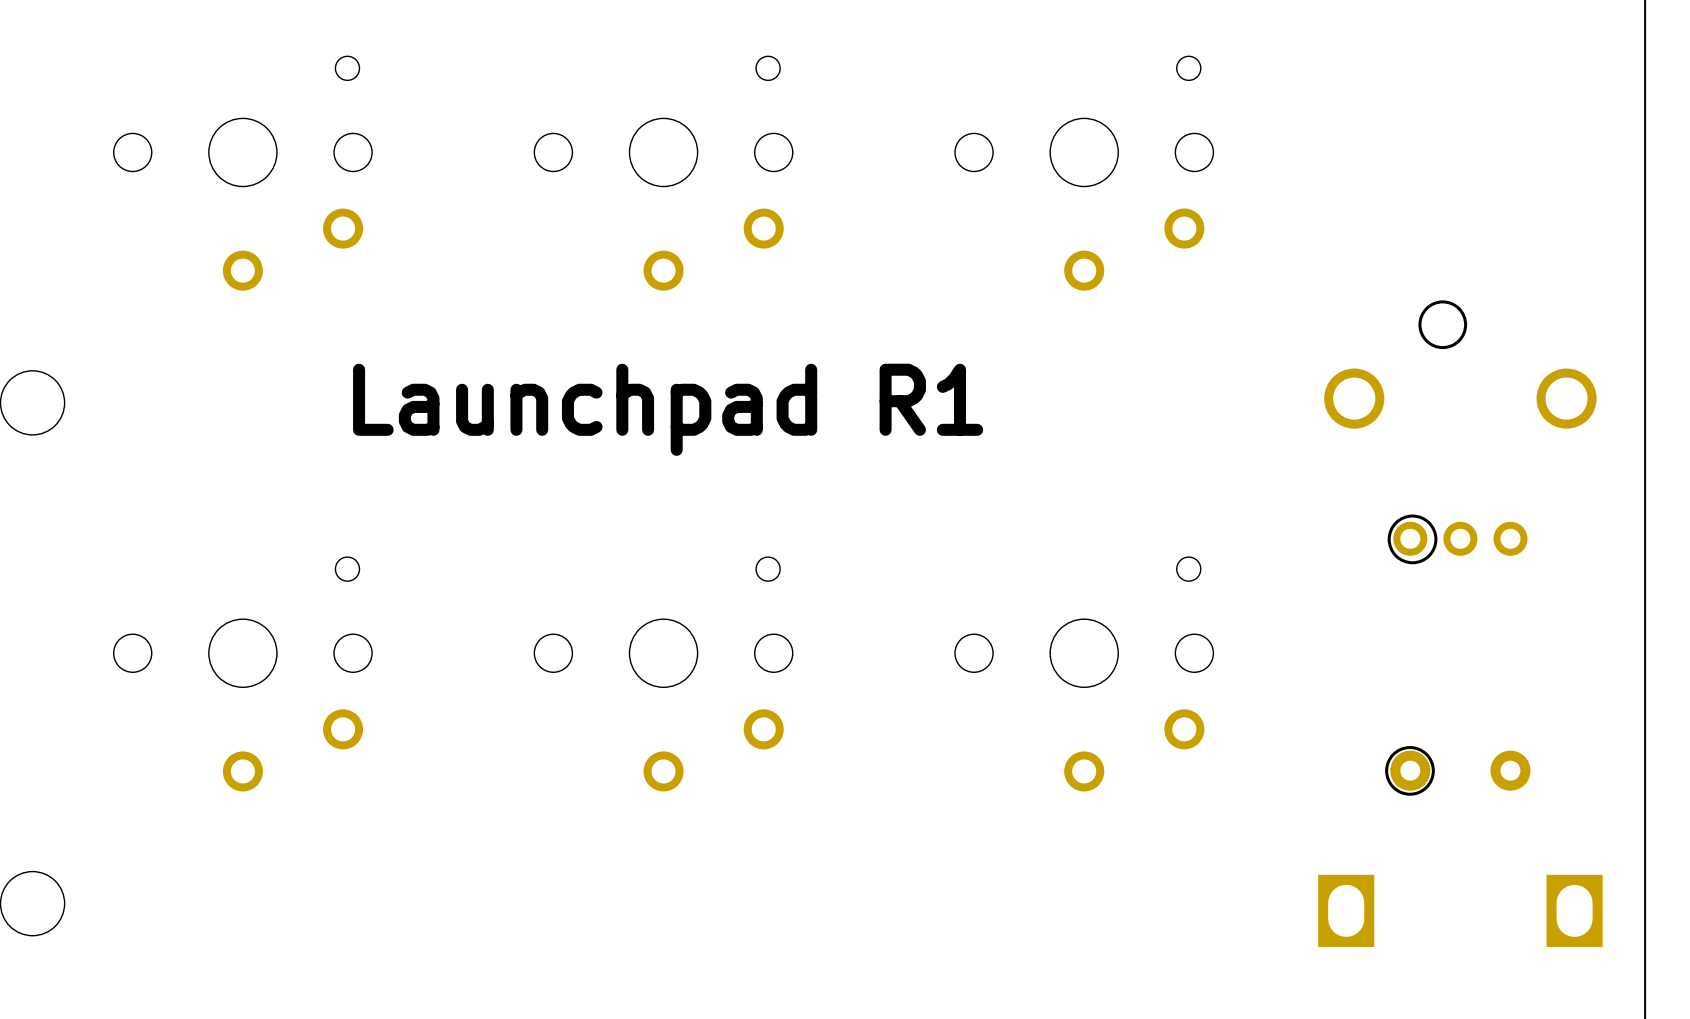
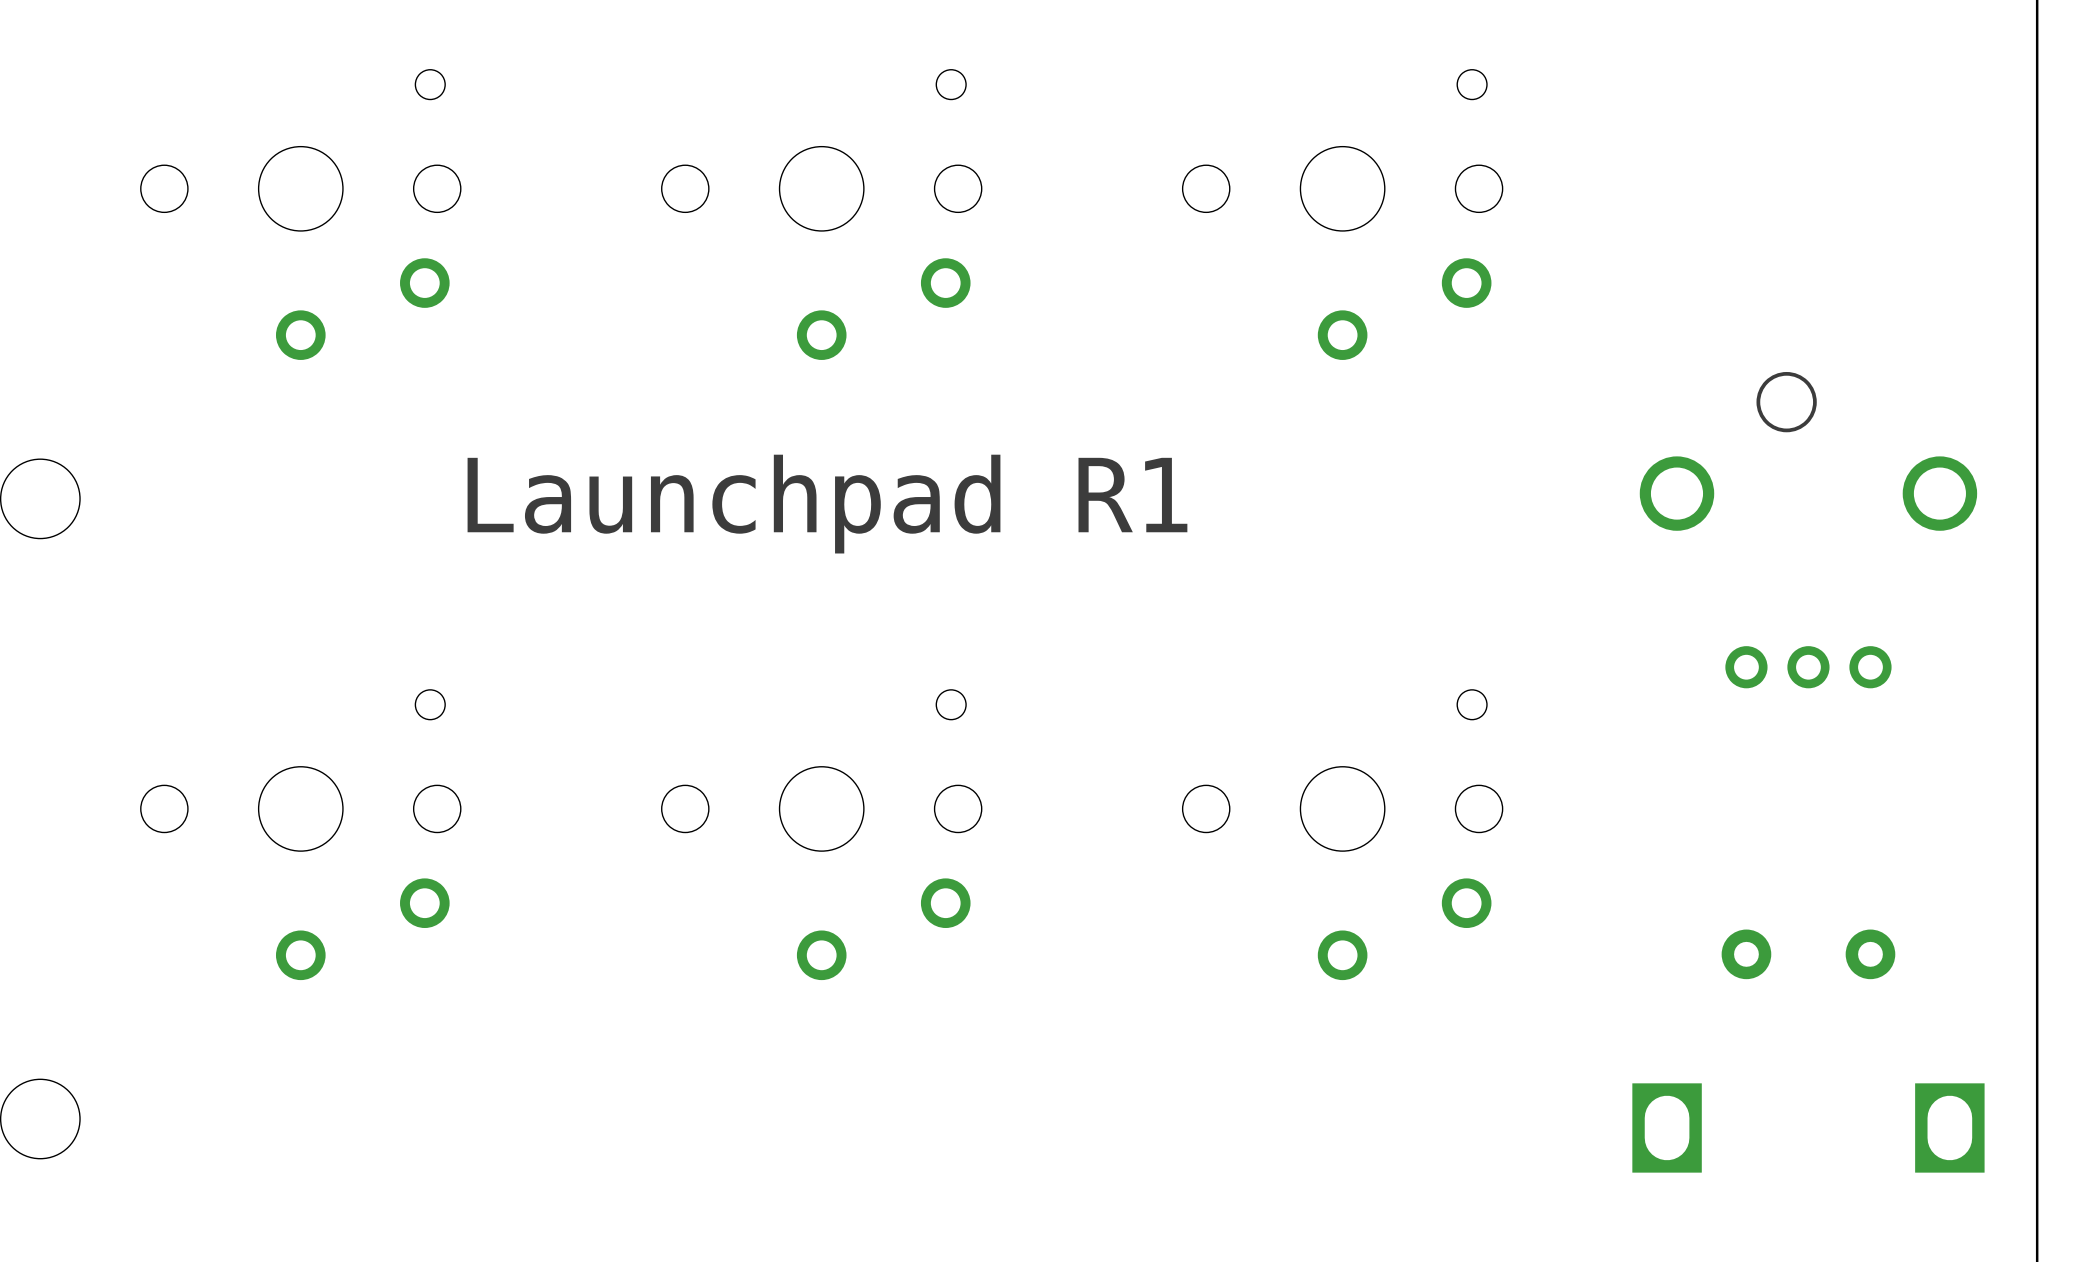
drawing: [1387, 514, 1438, 565] -> none
drawing: [1385, 746, 1435, 796] -> none

